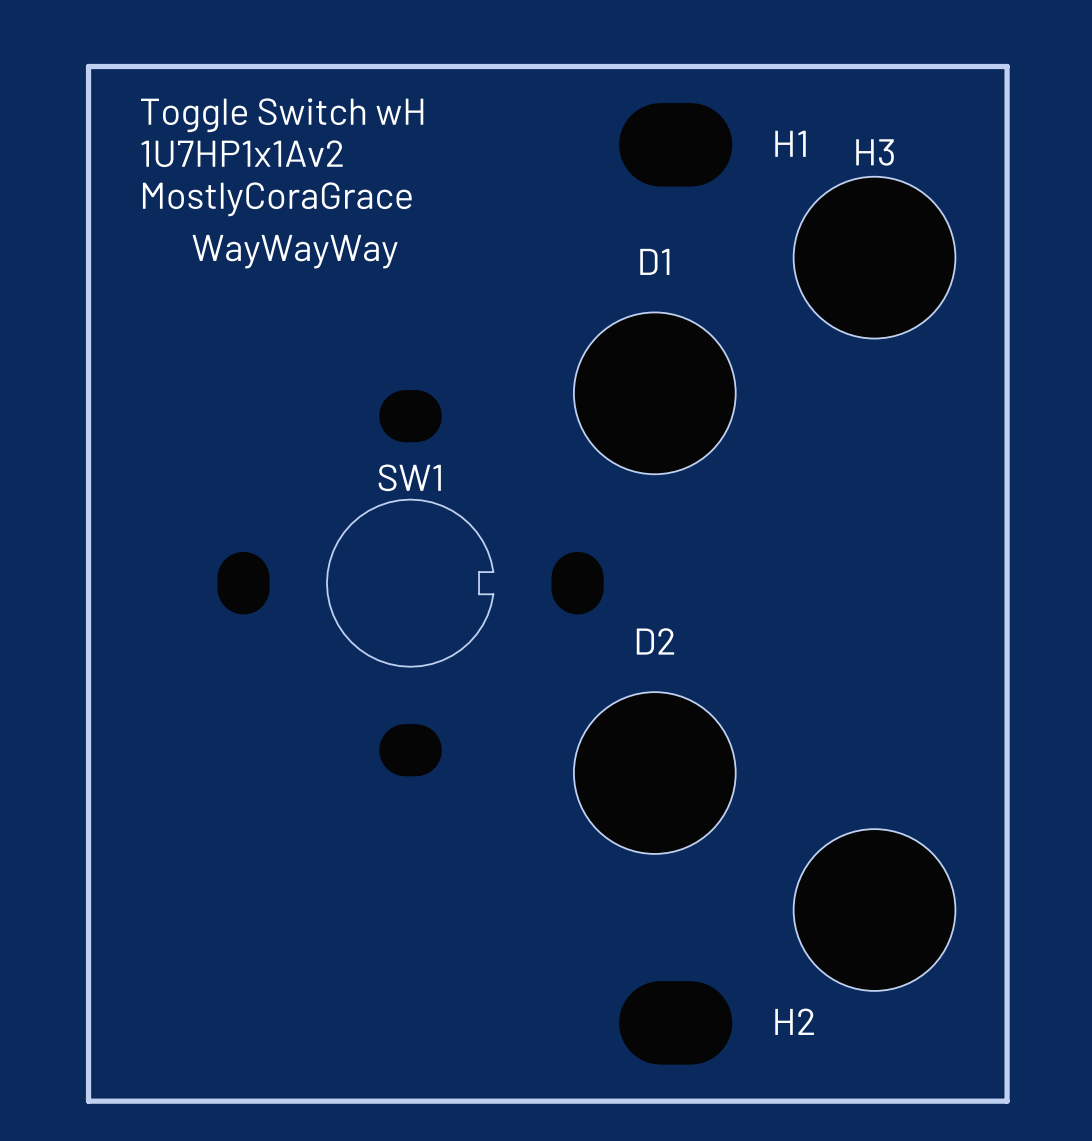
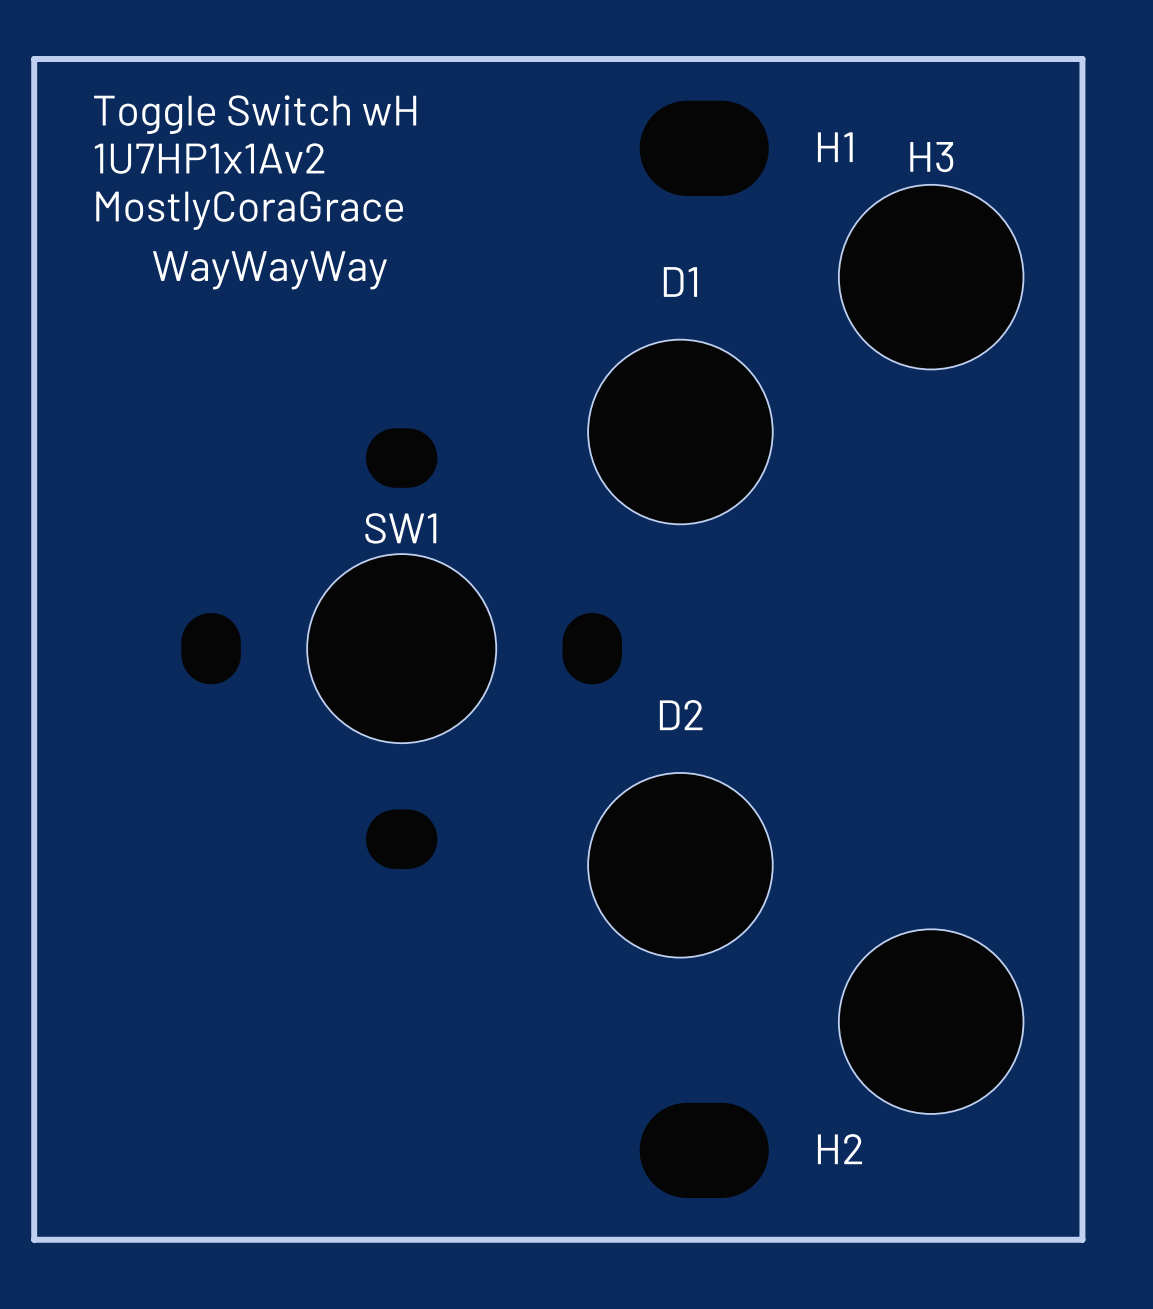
SW1 footprint: [217, 390, 604, 777] -> [181, 428, 623, 870]

